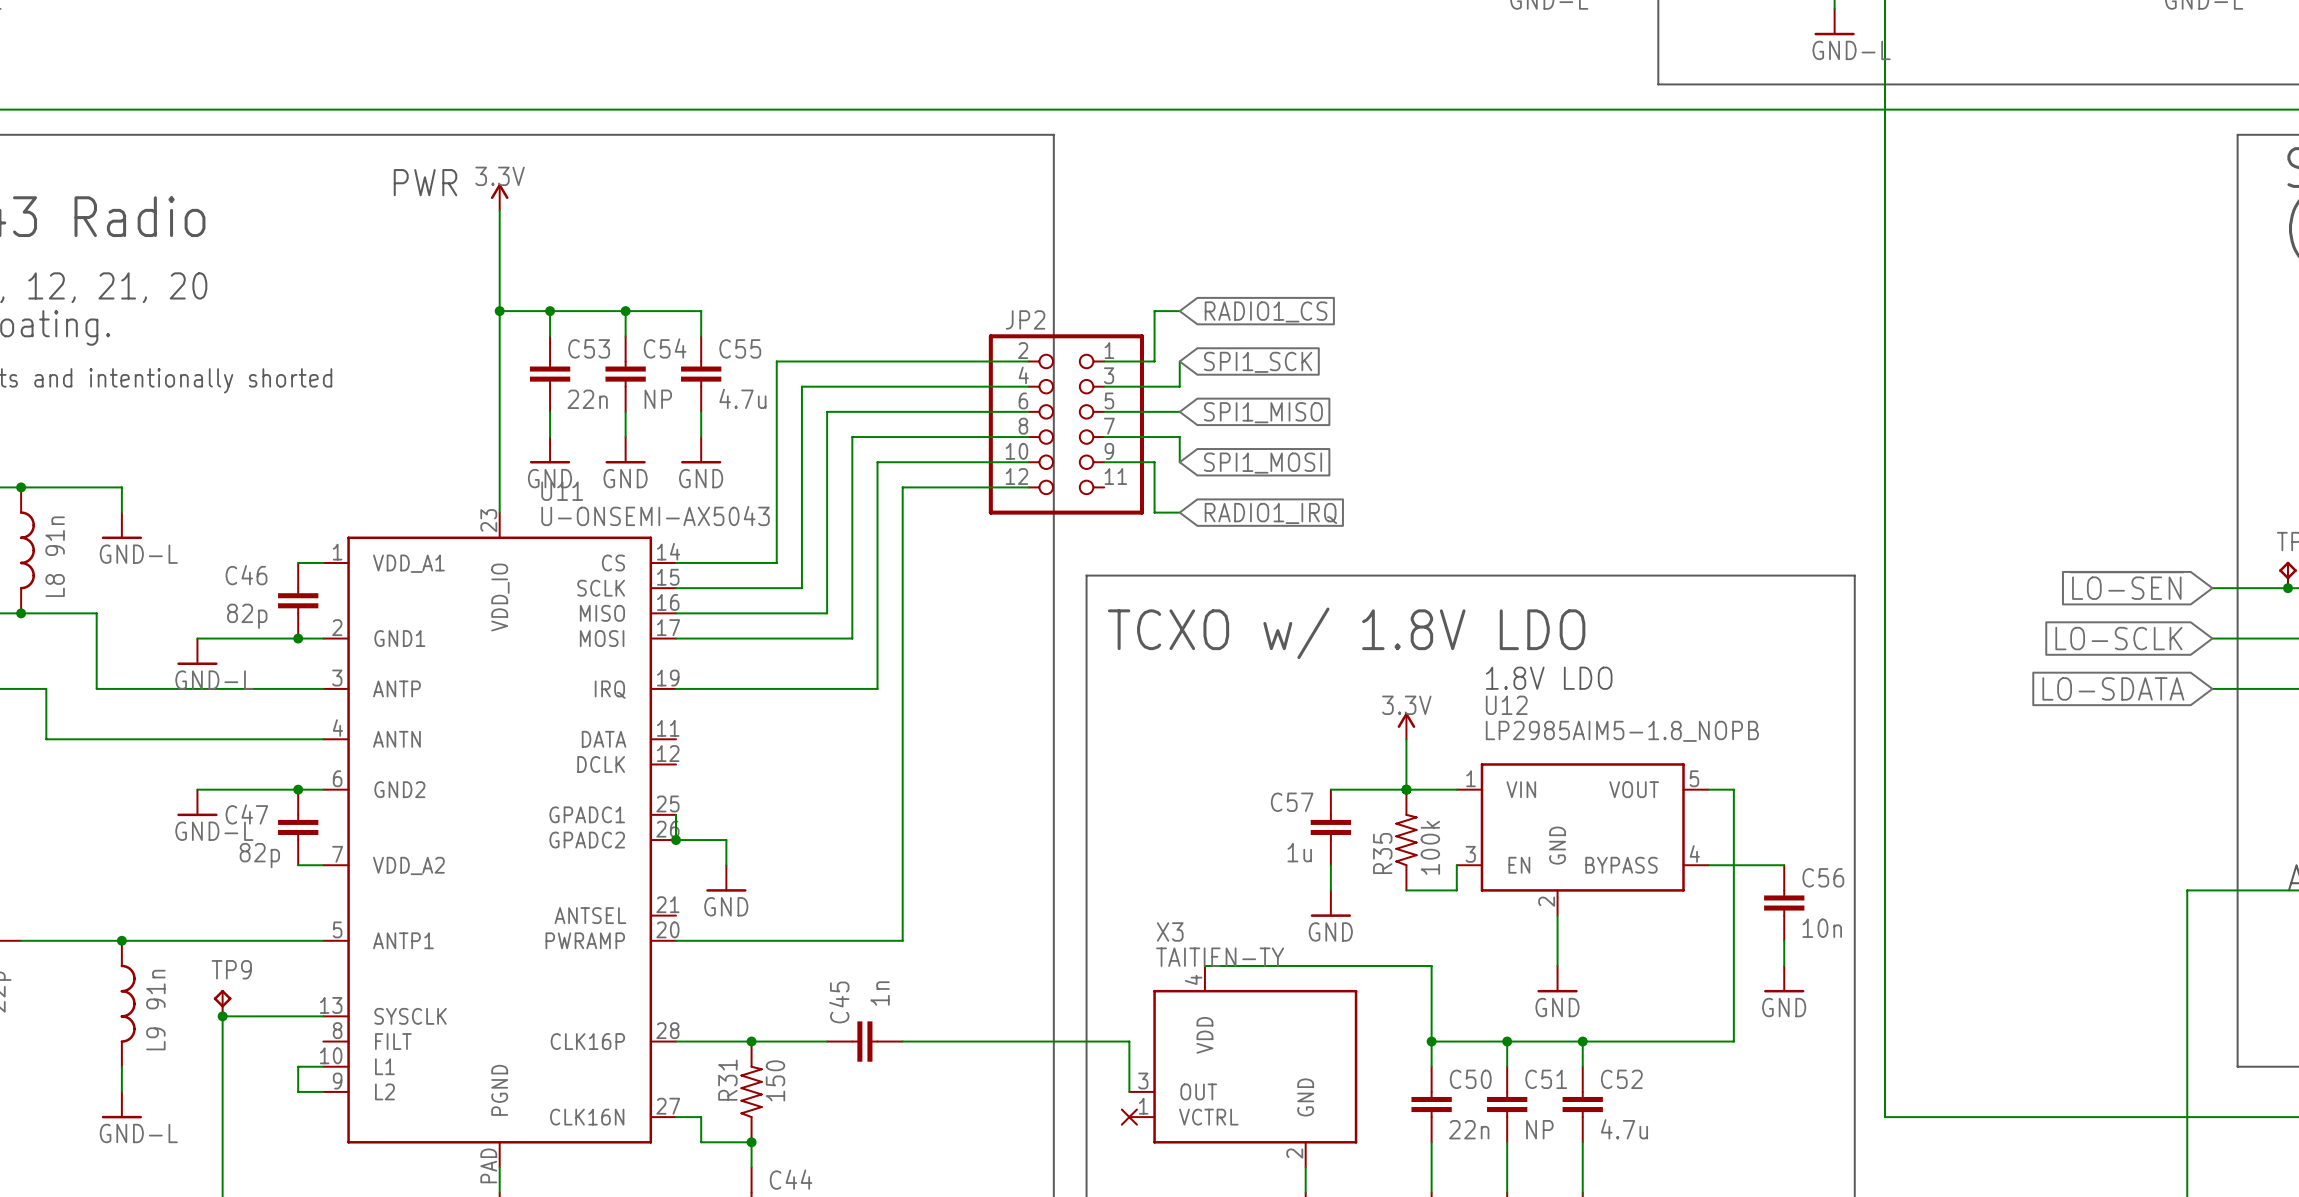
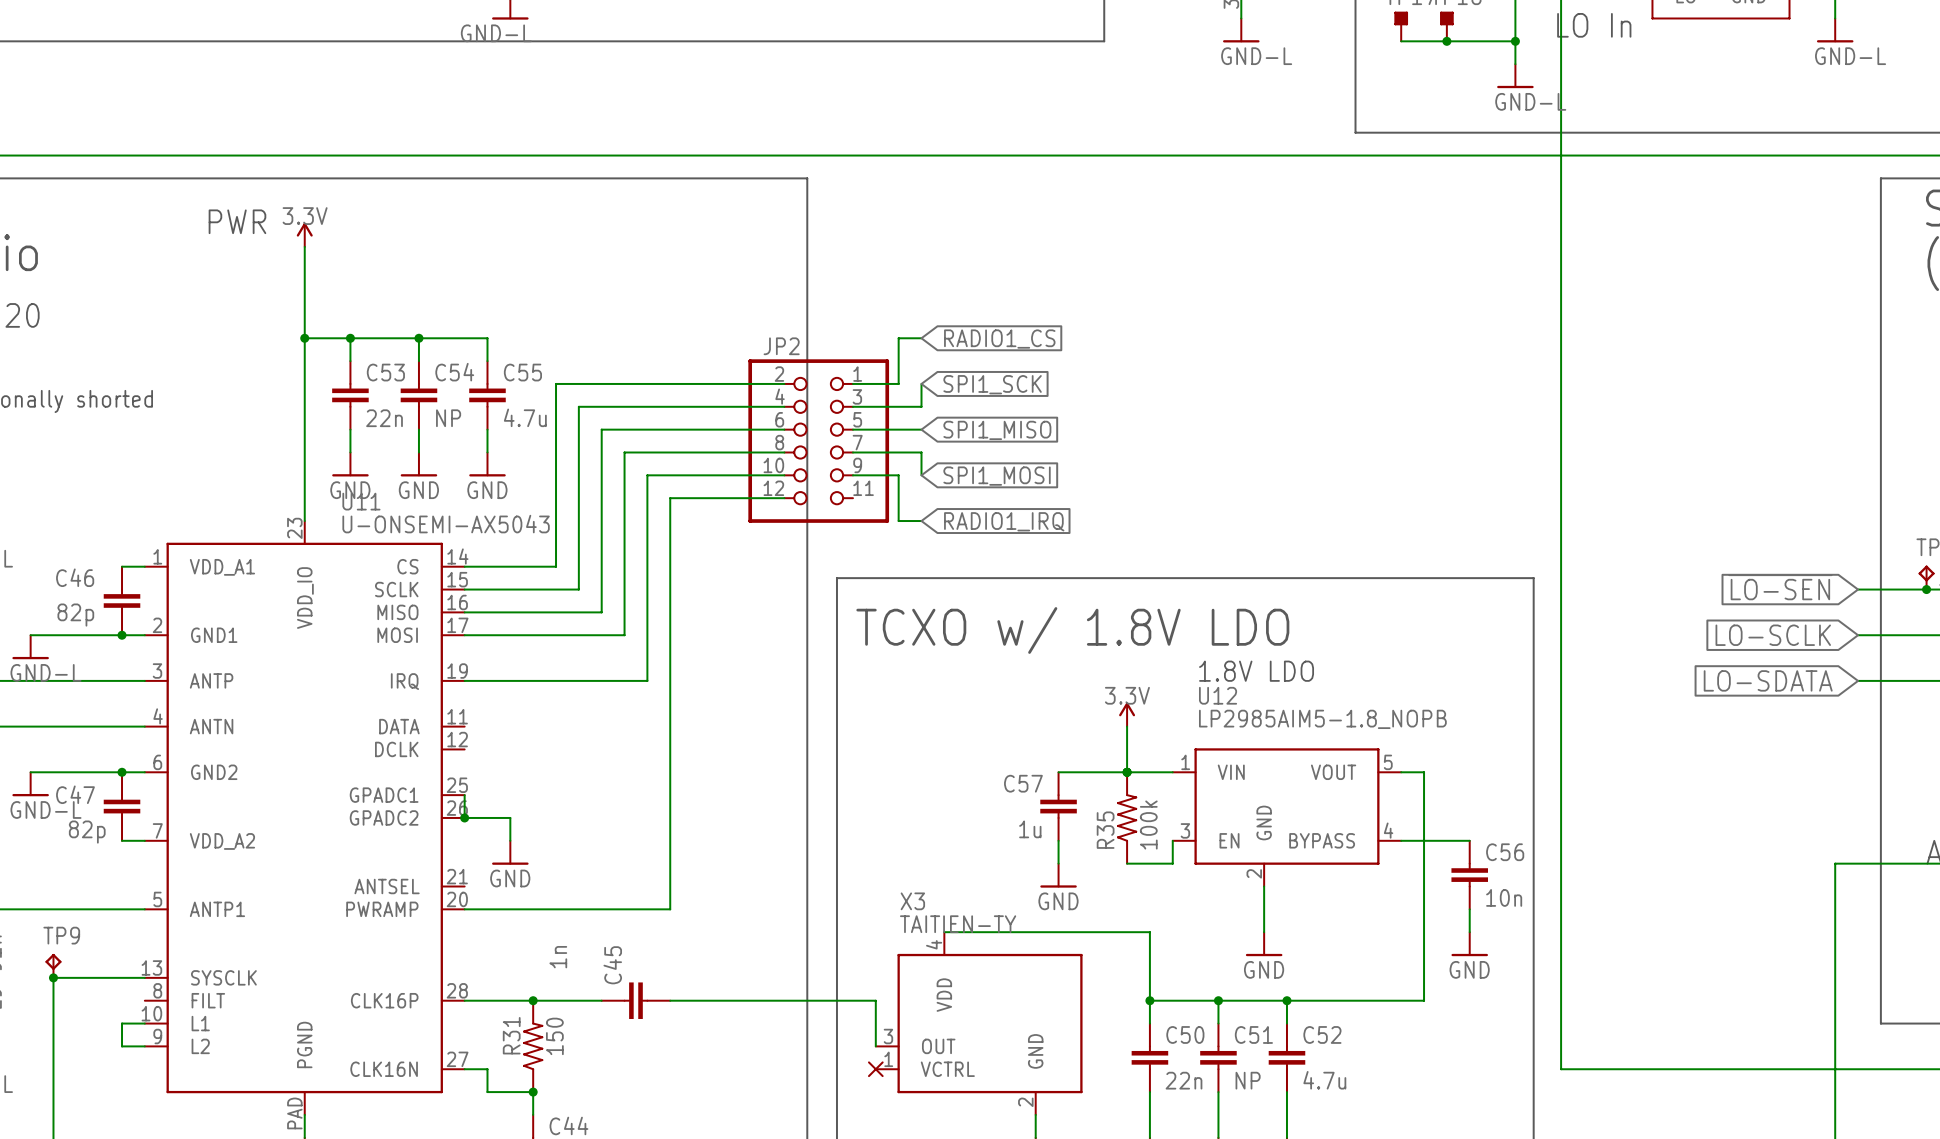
C45 value position: 1n (880, 993) -> 1n (558, 957)

